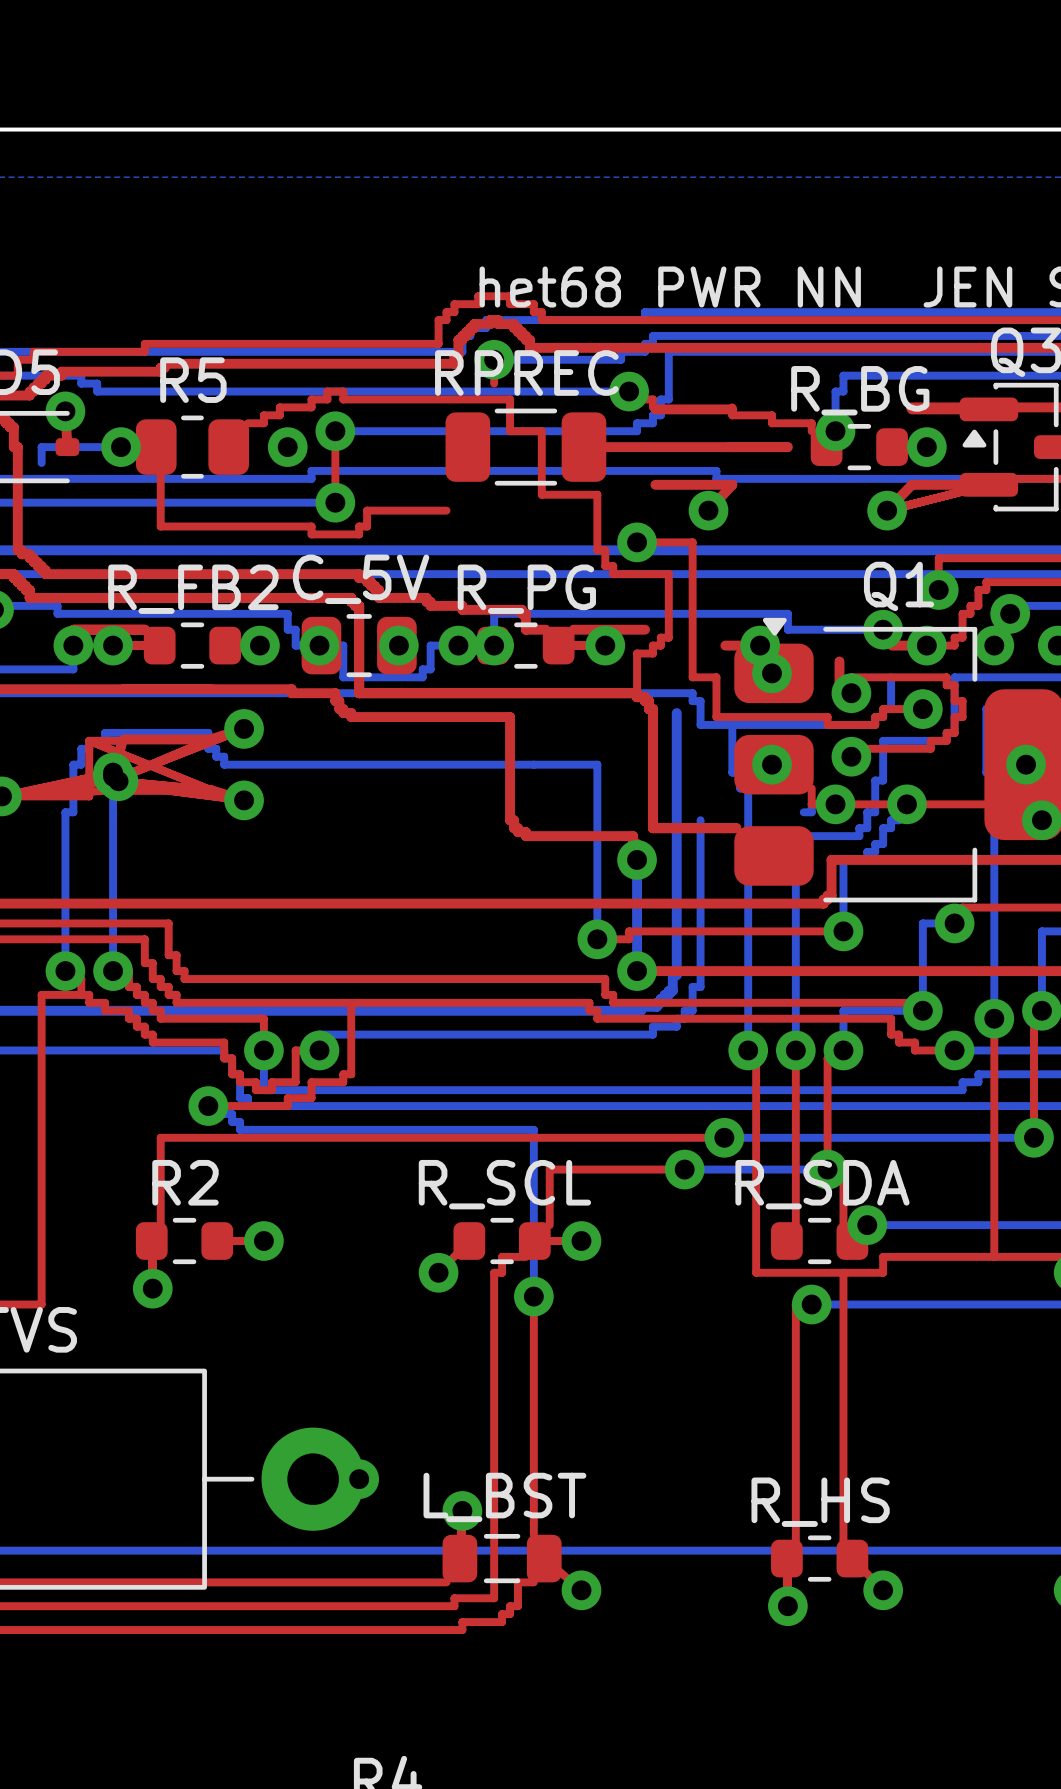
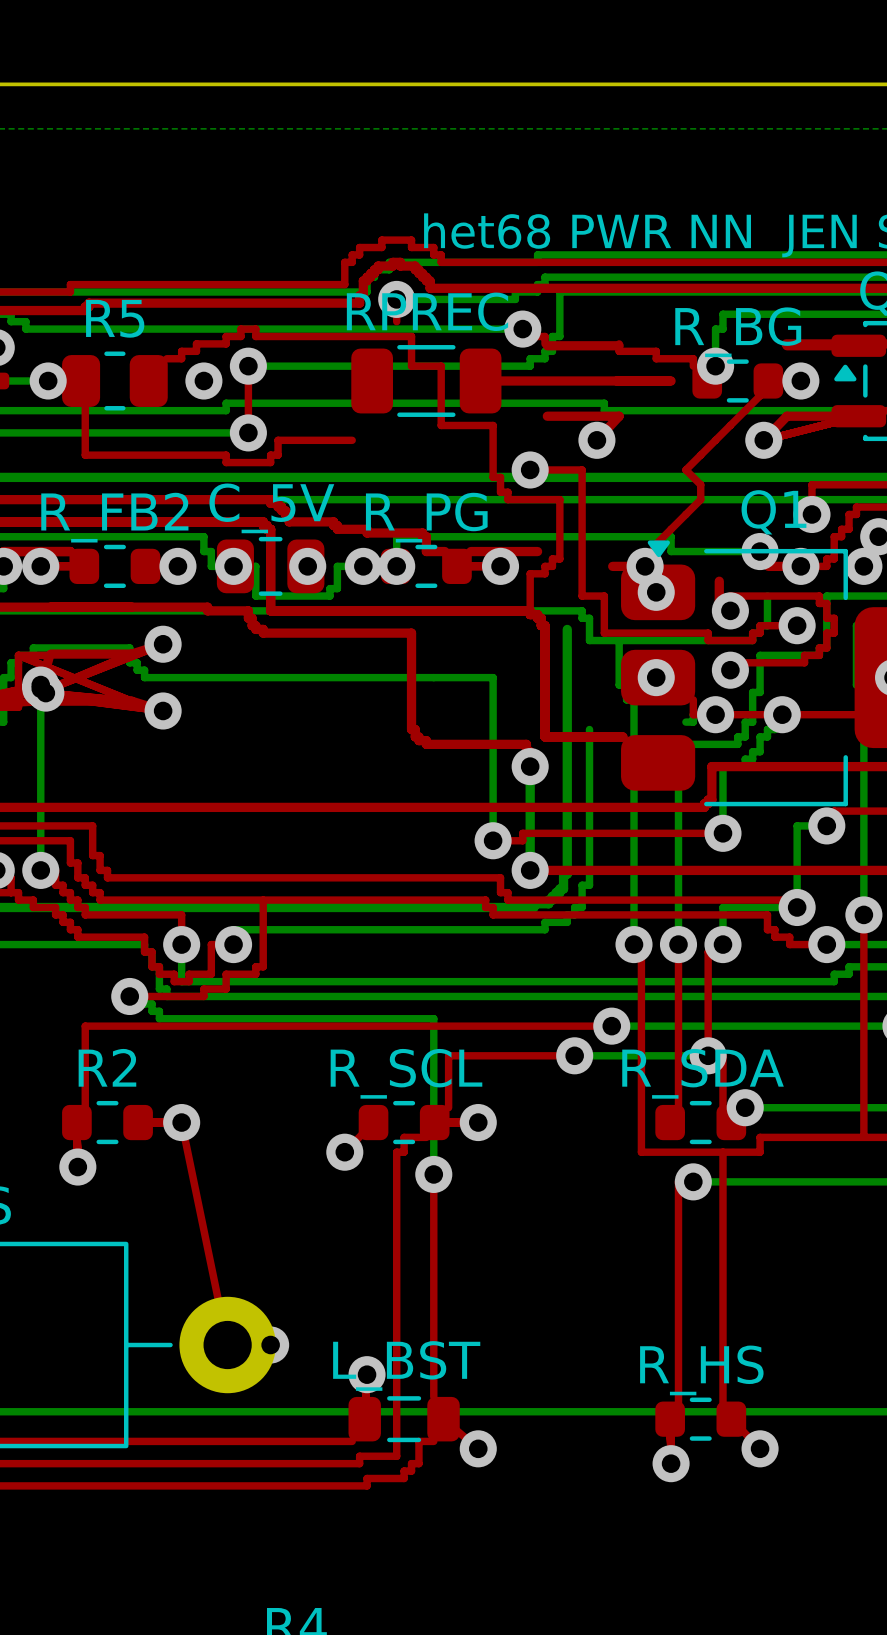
top track: none -> (768, 380) (760, 395) (685, 469) (700, 484) (700, 499) (656, 544) (645, 566)
top track: none -> (181, 1122) (227, 1345)

